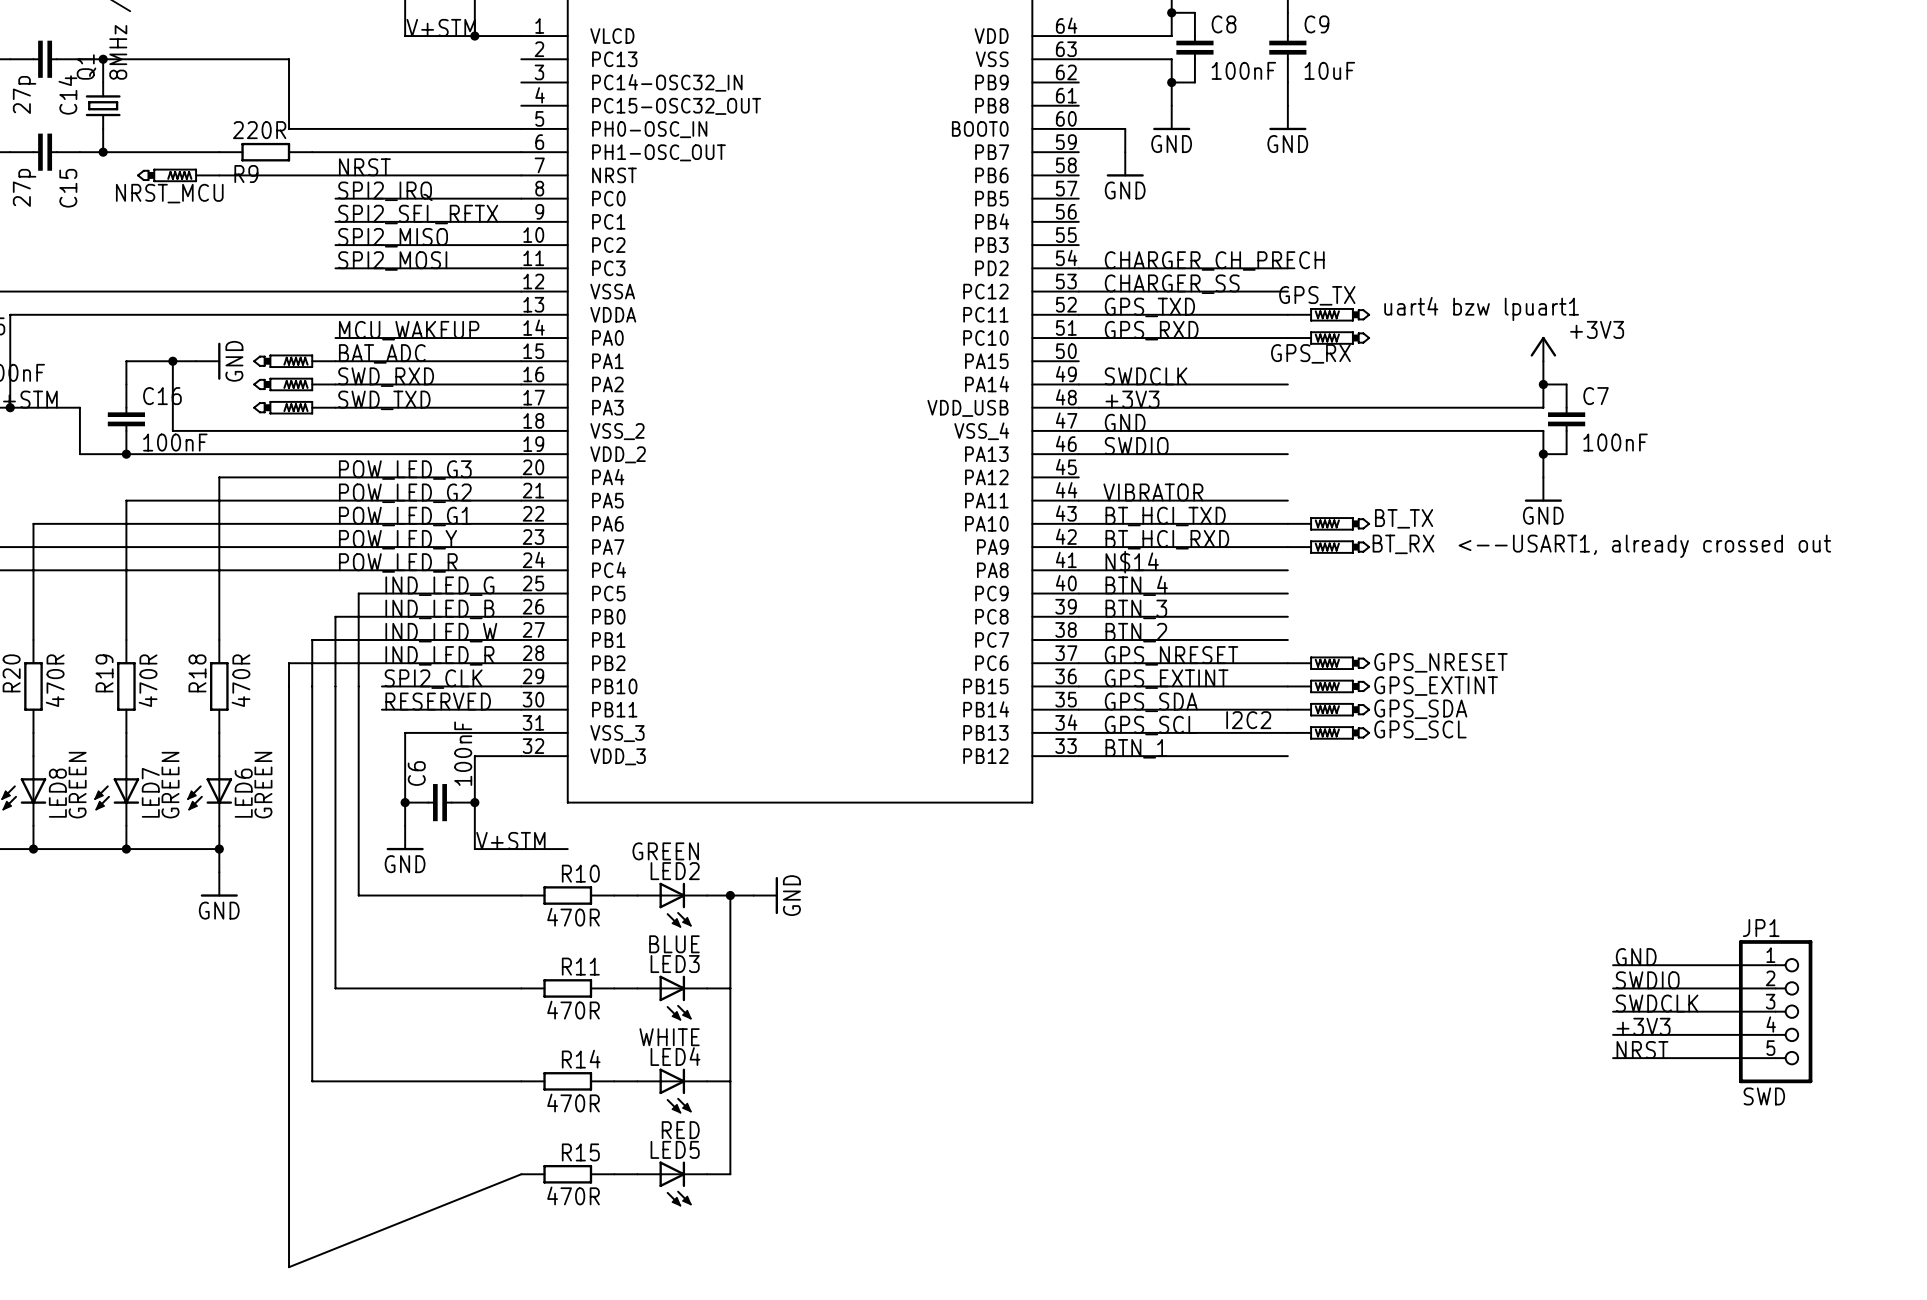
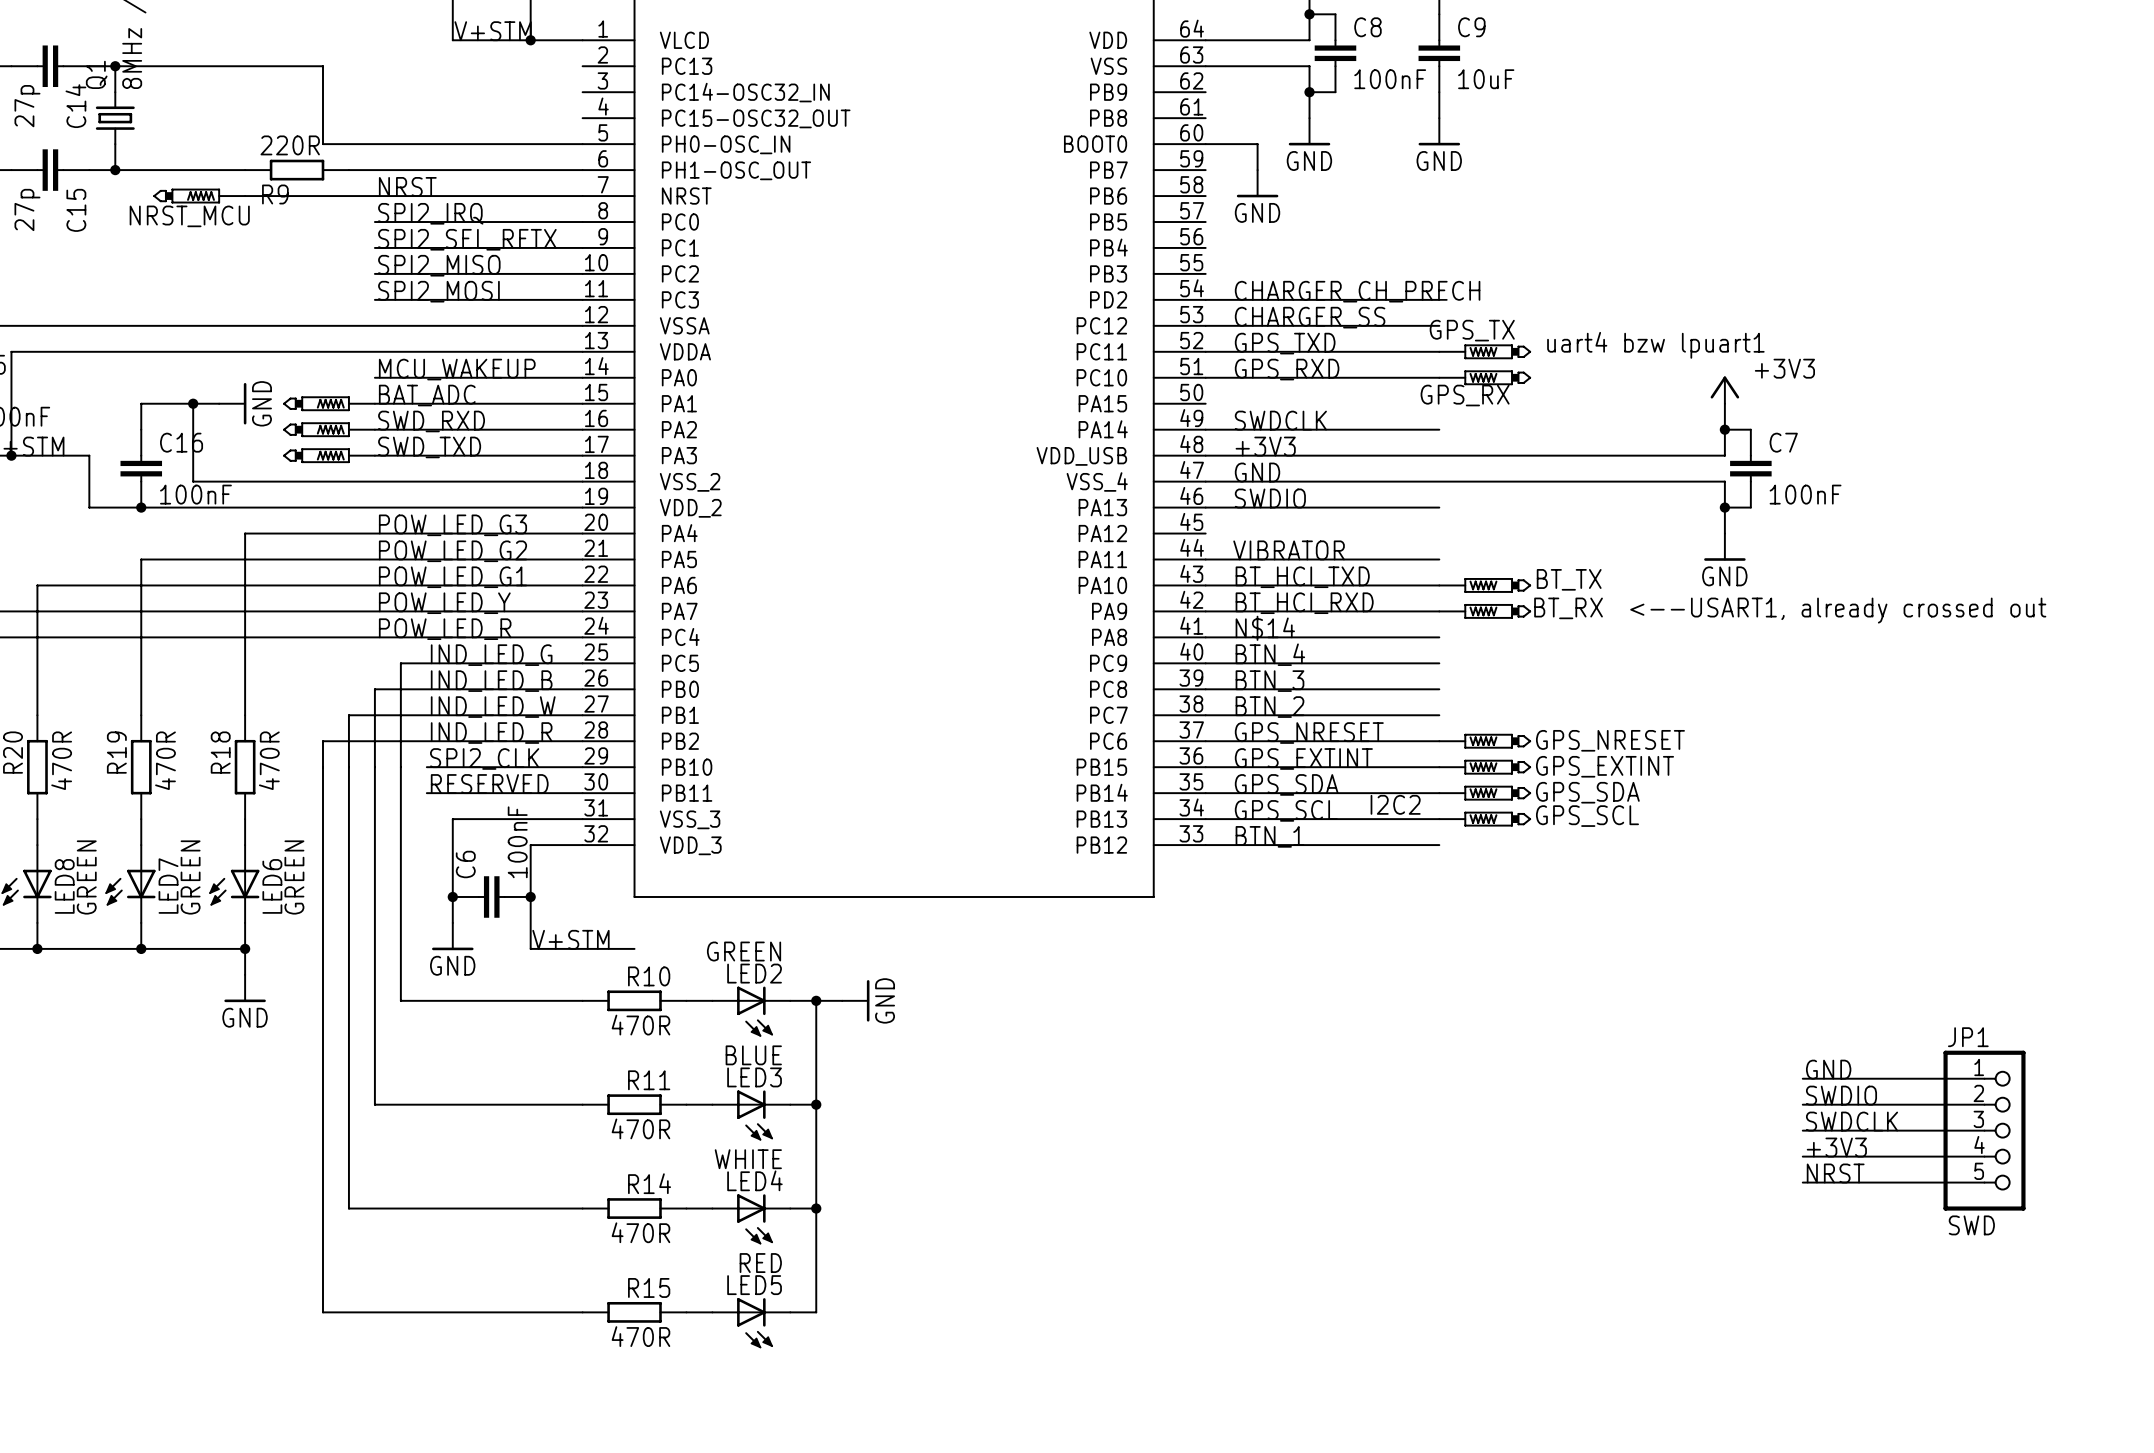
junction: none -> (816, 1104)
junction: none -> (816, 1208)
wire: (289, 1174) (289, 1267) (521, 1174) -> (322, 1312) (582, 1312)

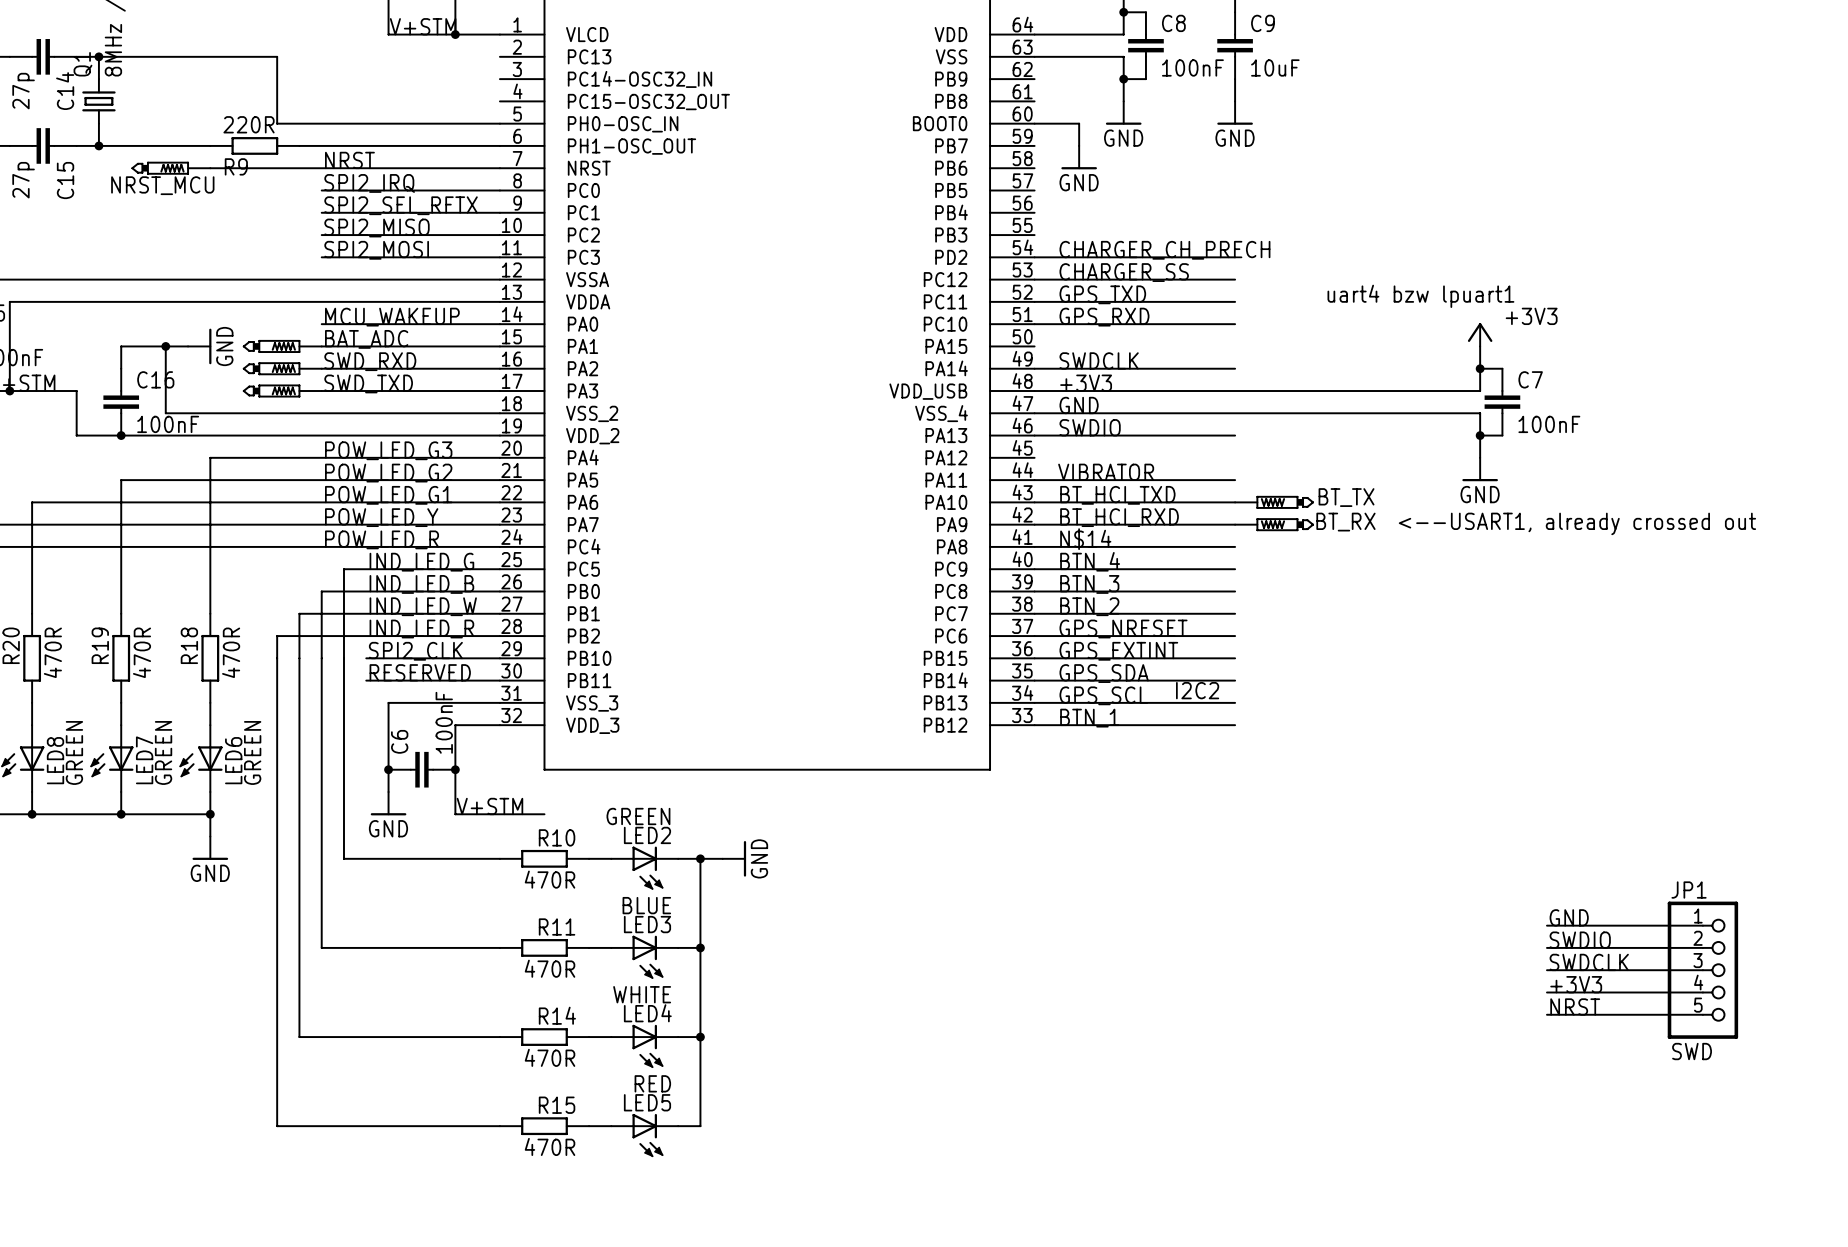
GPS_TX: (1485, 351) -> none
GPS_RX: (1485, 377) -> none
GPS_NRESET: (1485, 741) -> none
GPS_EXTINT: (1485, 767) -> none
GPS_SDA: (1485, 793) -> none
GPS_SCL: (1485, 819) -> none

